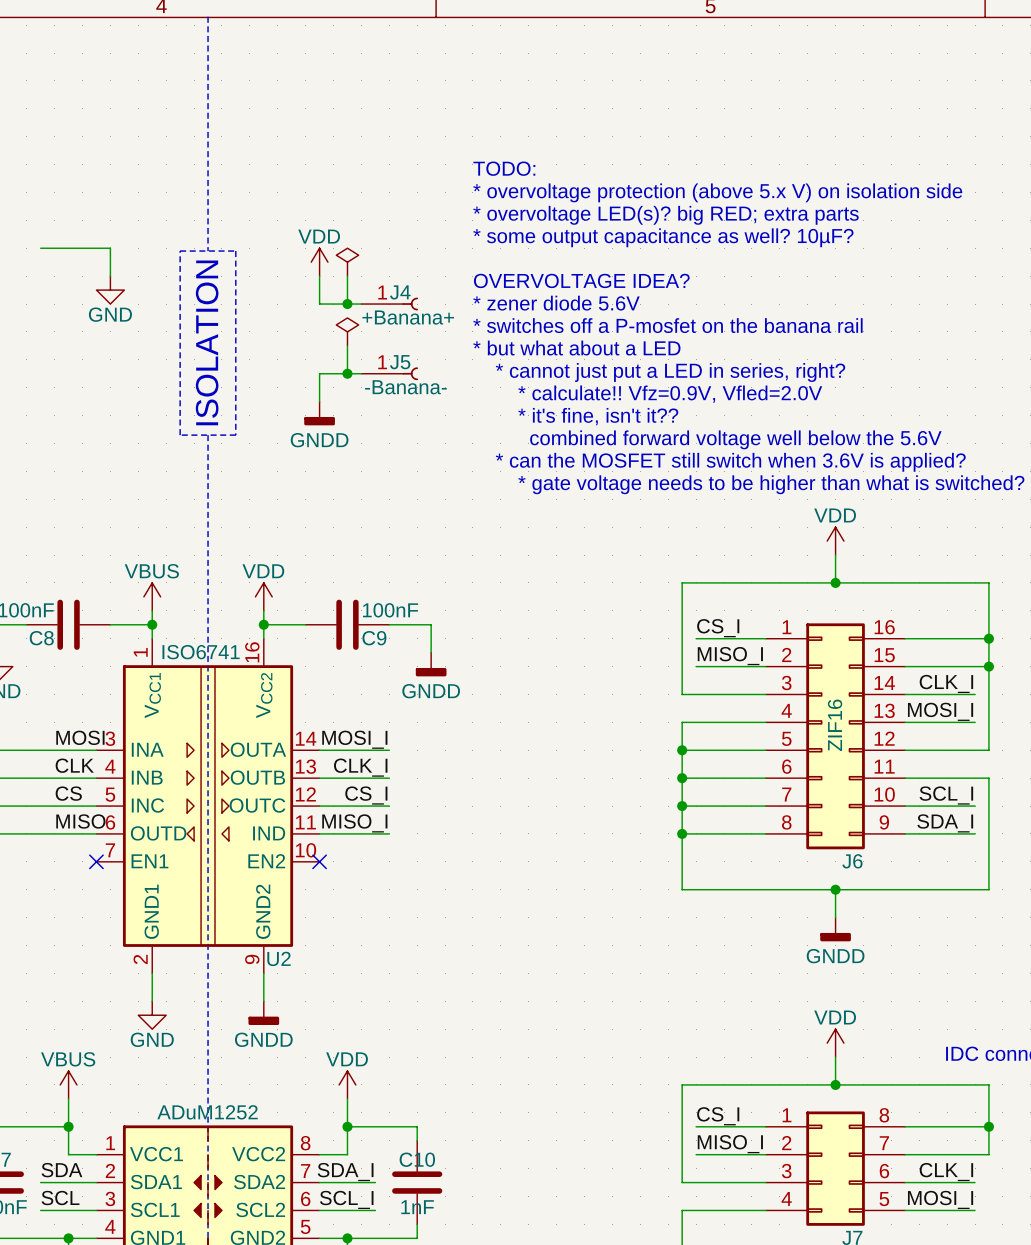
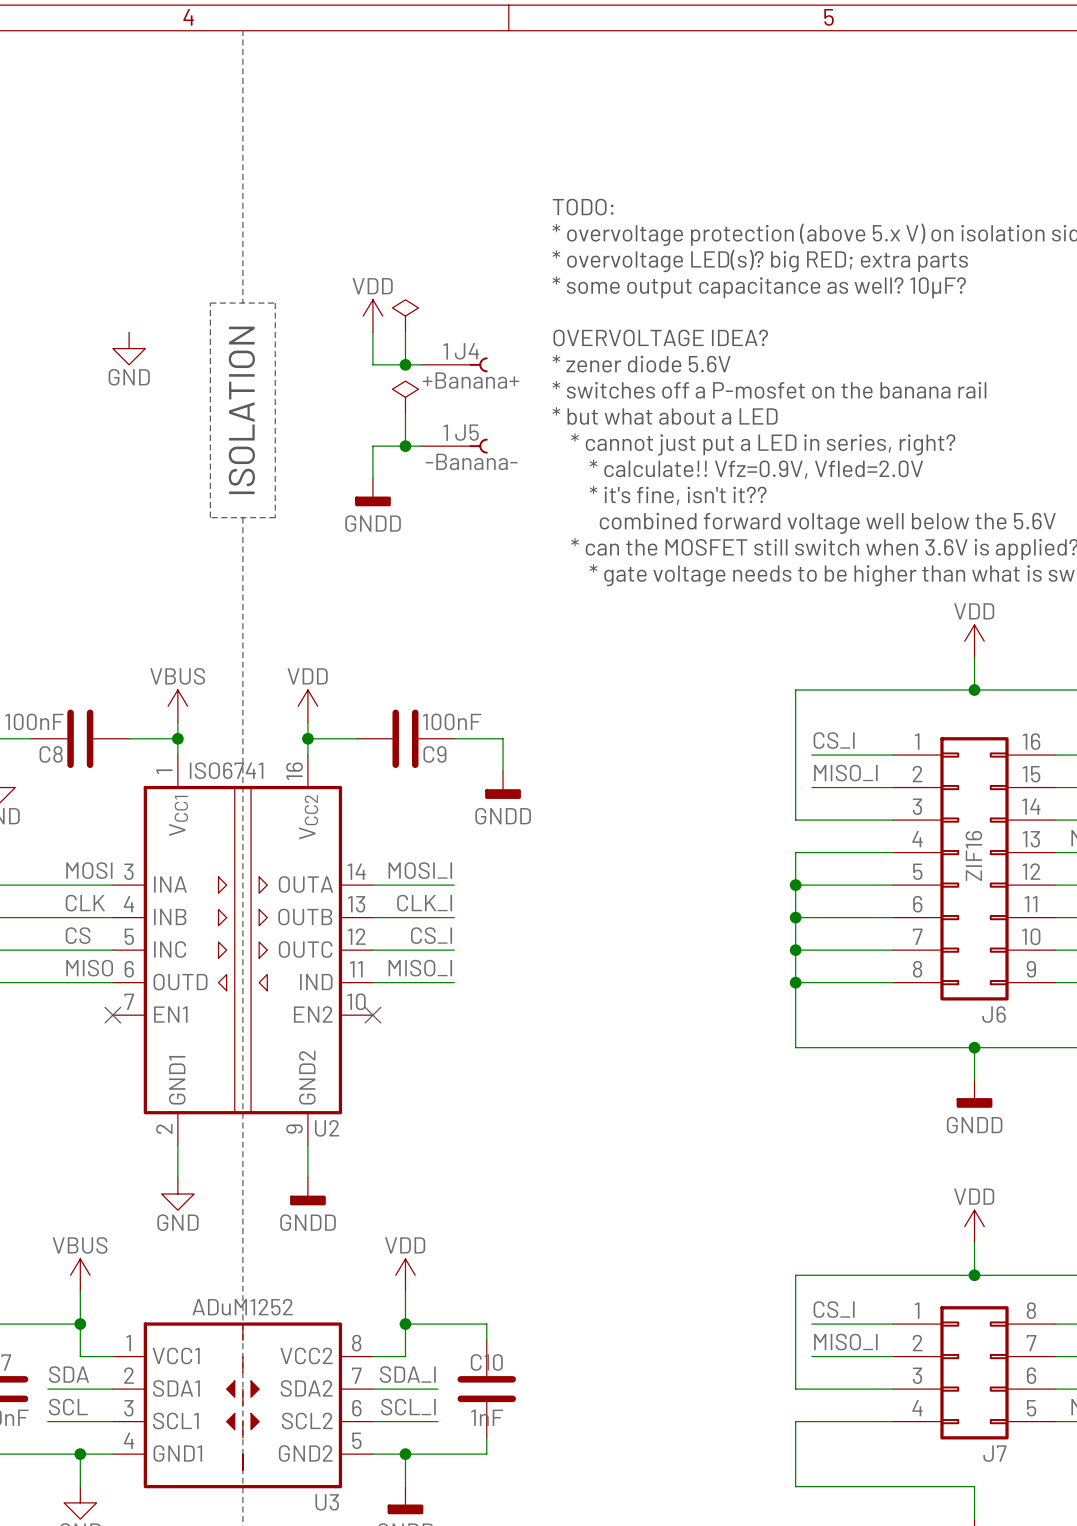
wire: (40, 248) (110, 248) (110, 276) -> none

